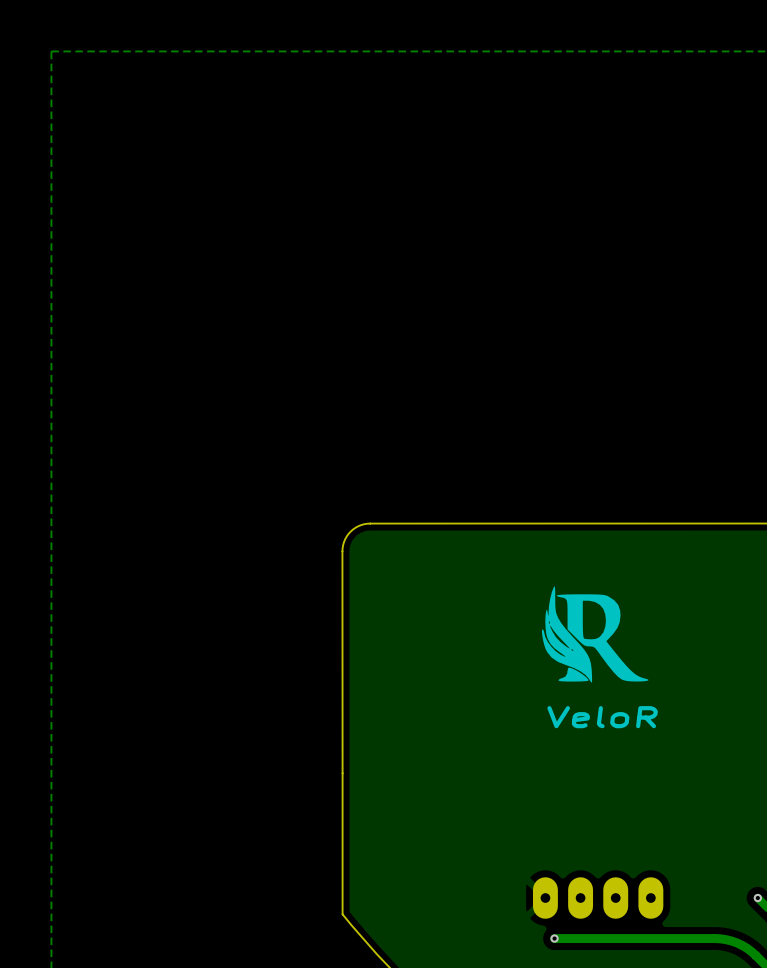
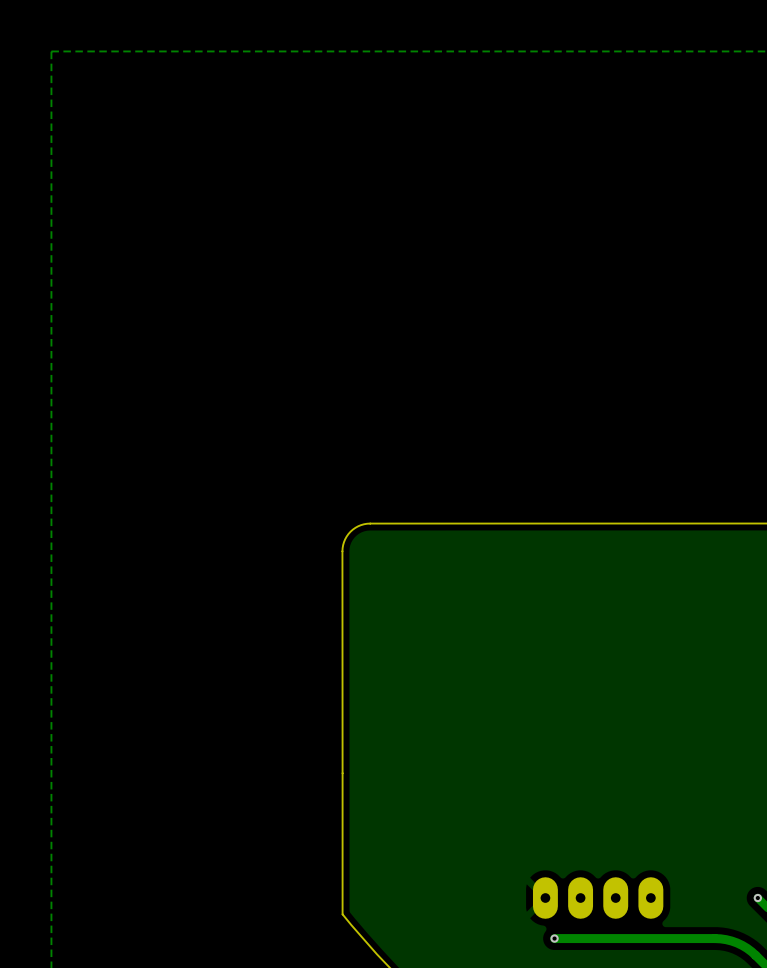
drawing: [541, 586, 649, 683] -> none
text: VeloR (602, 717) -> none

